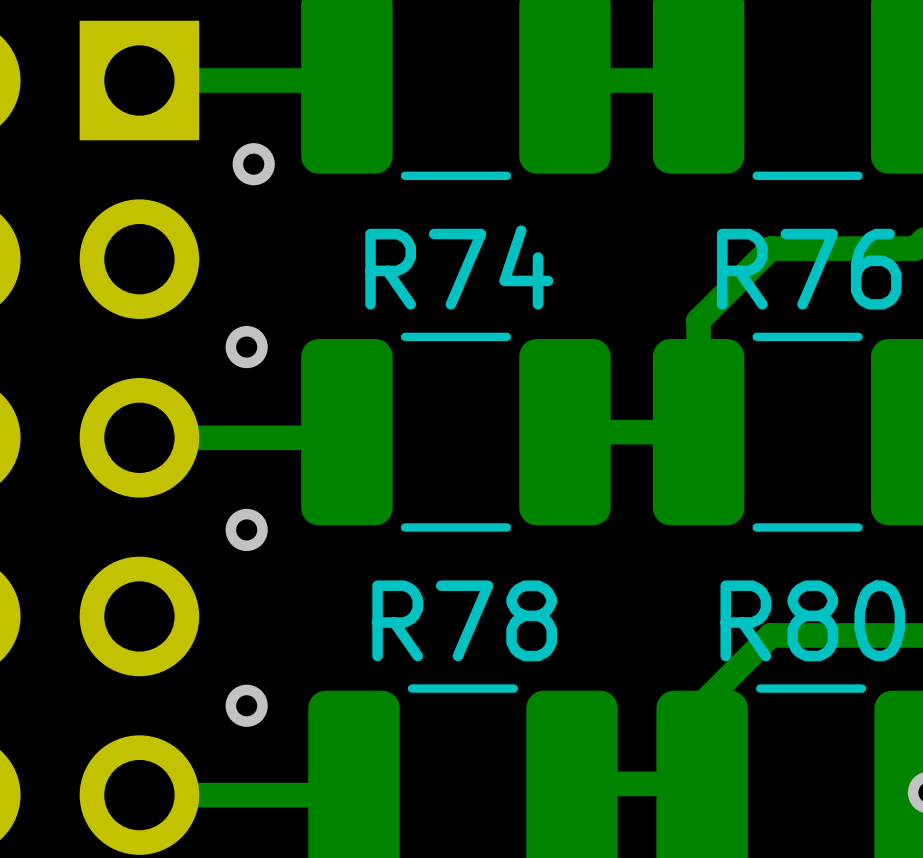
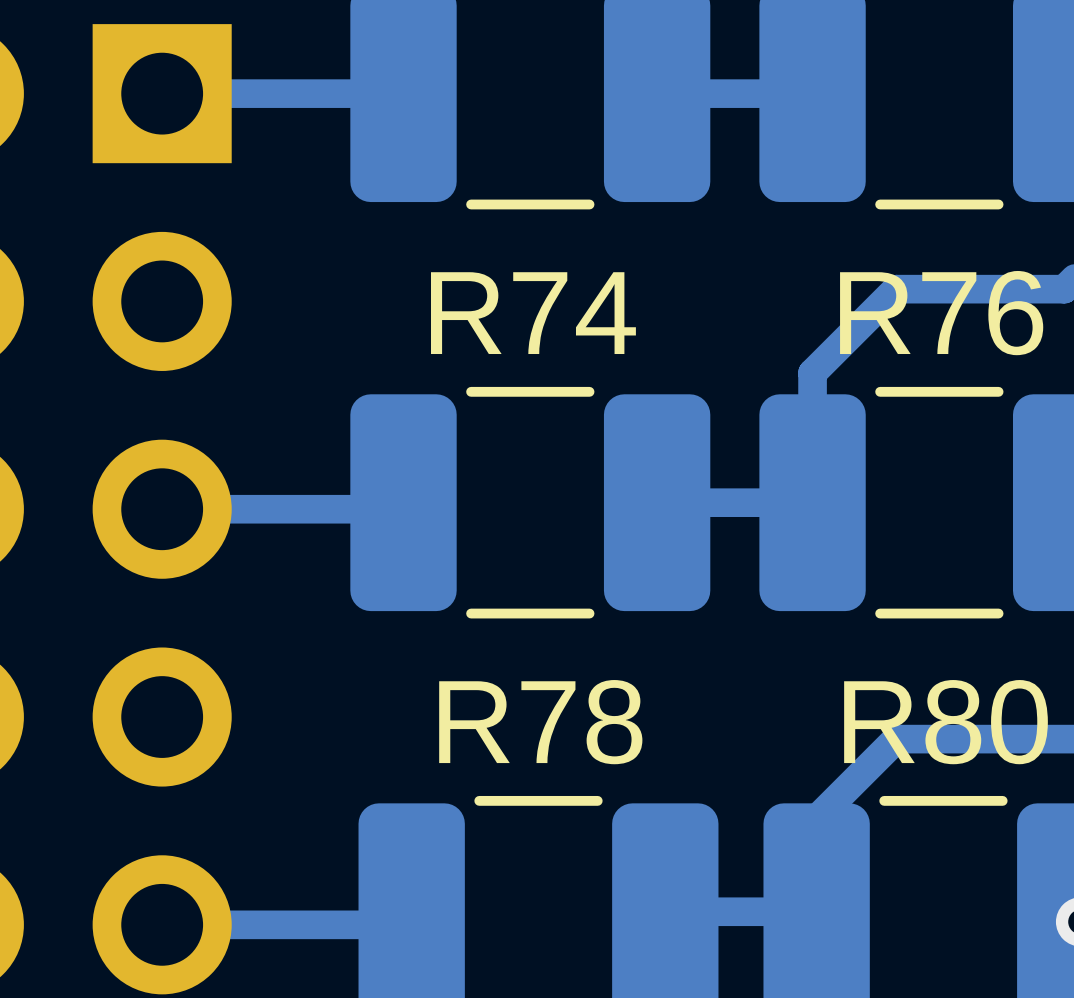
via: (253, 164) -> none
via: (246, 347) -> none
via: (246, 529) -> none
via: (246, 705) -> none

